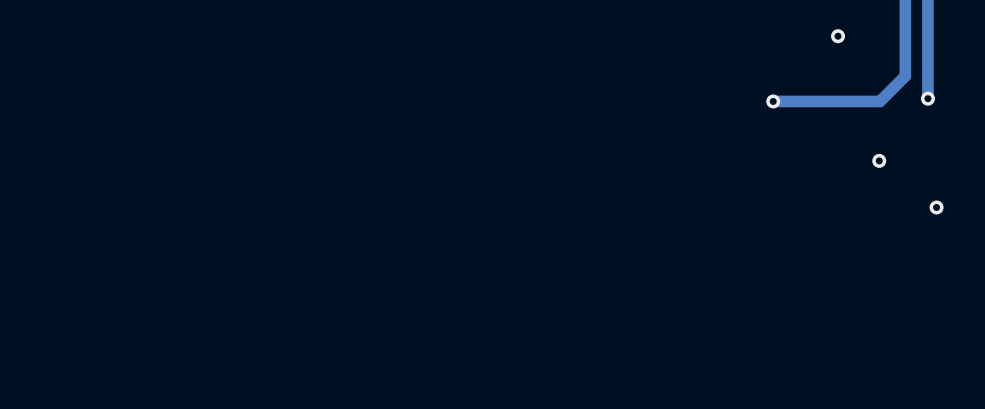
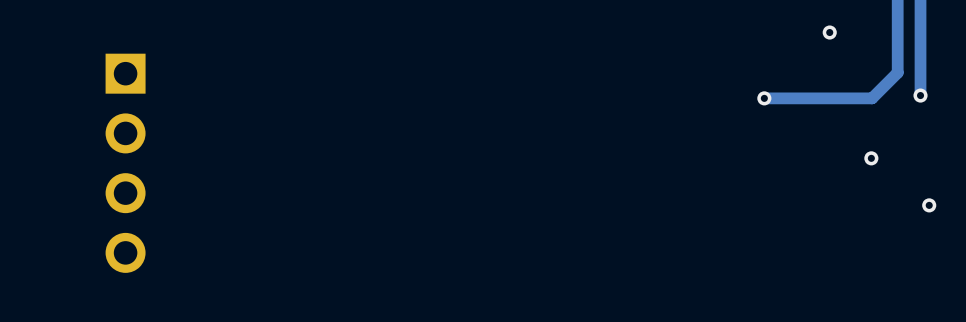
part: none -> (125, 163)

